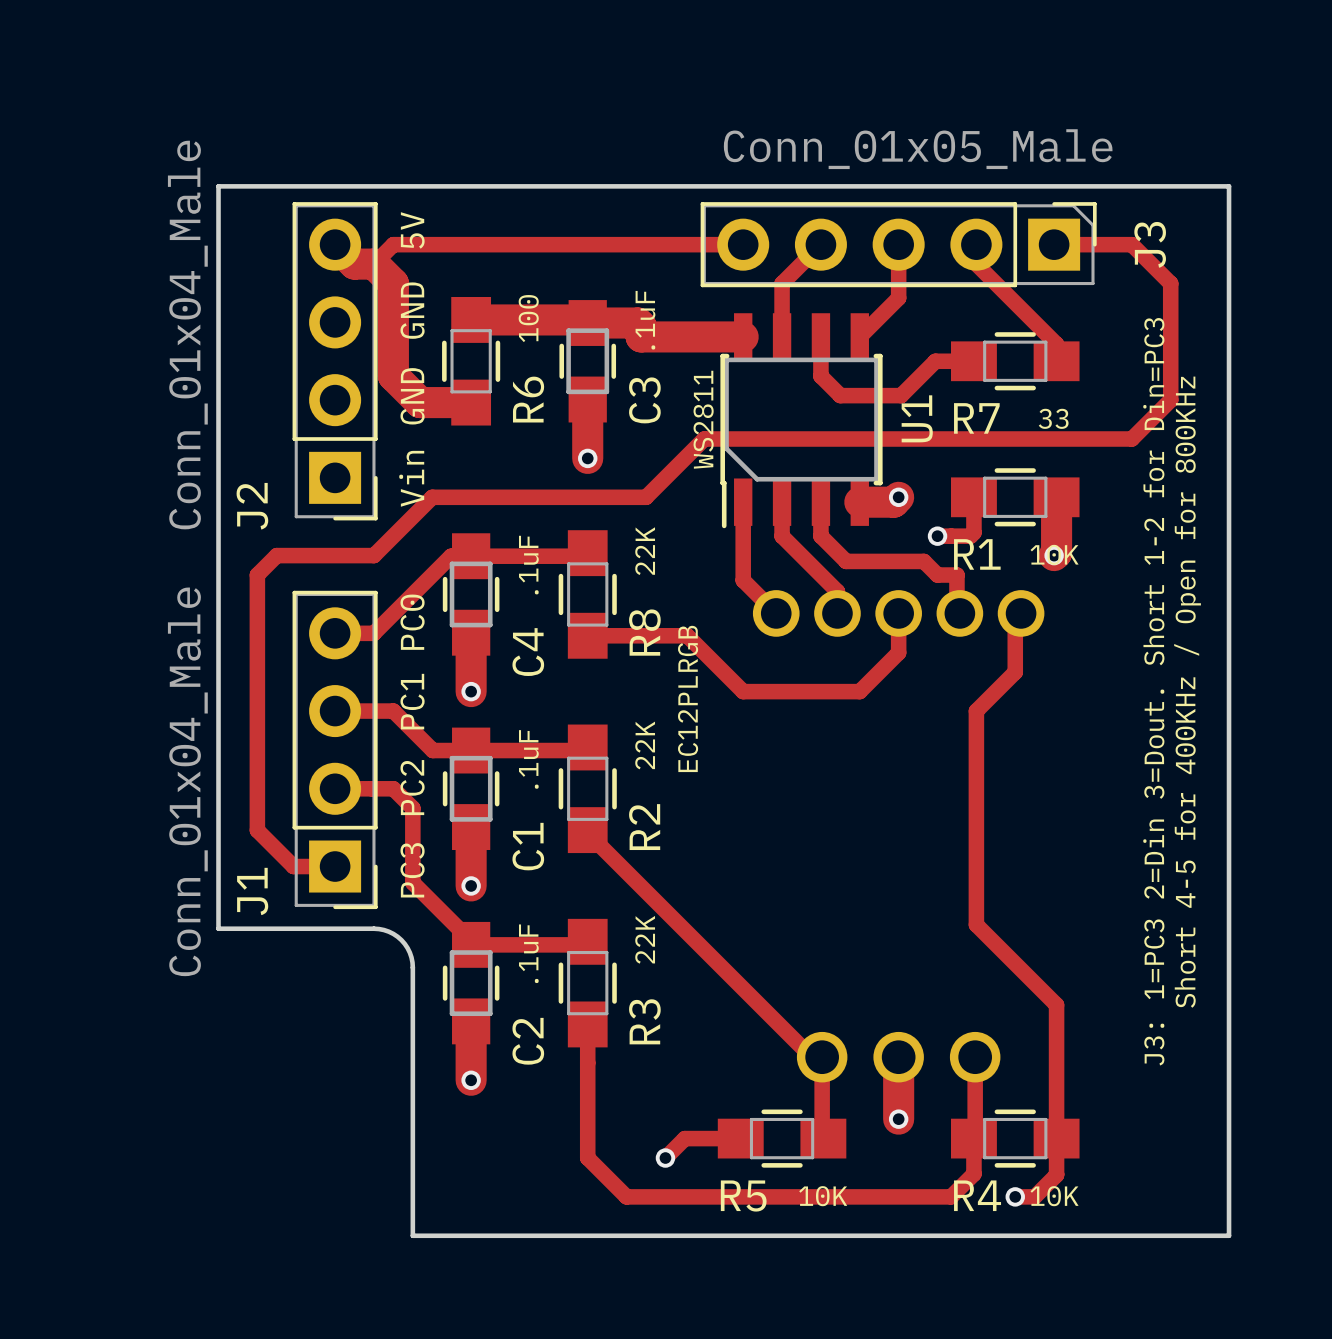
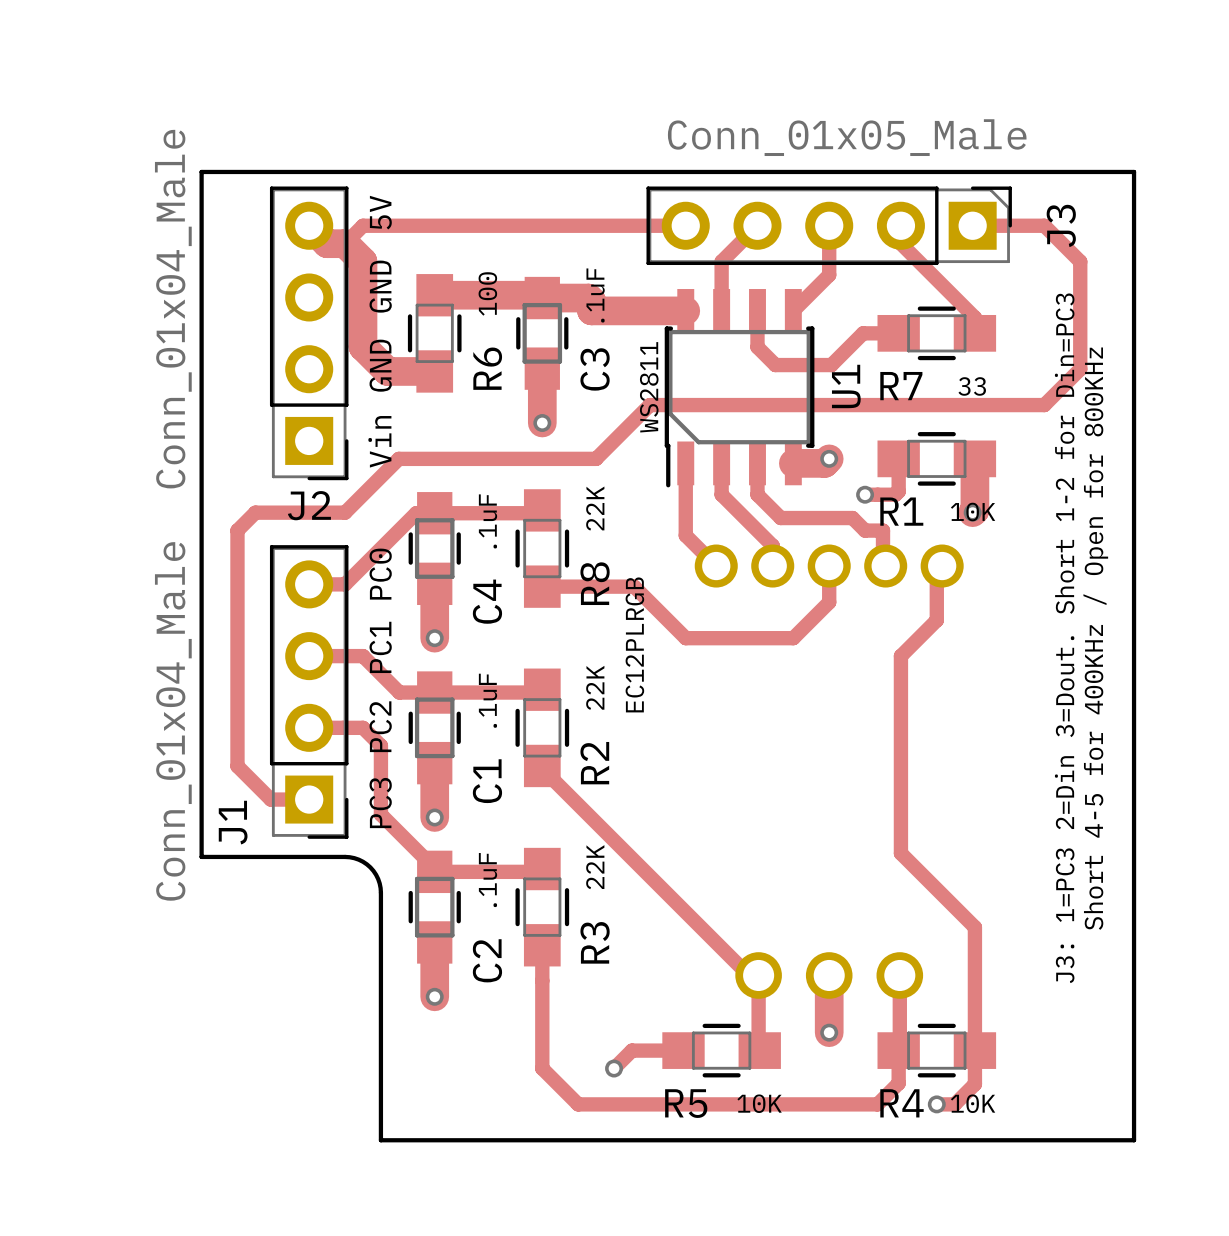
J2 name rotation: 0° (252, 506) -> 90° clockwise (309, 505)
J2 name position: J2 (252, 506) -> J2 (309, 505)

